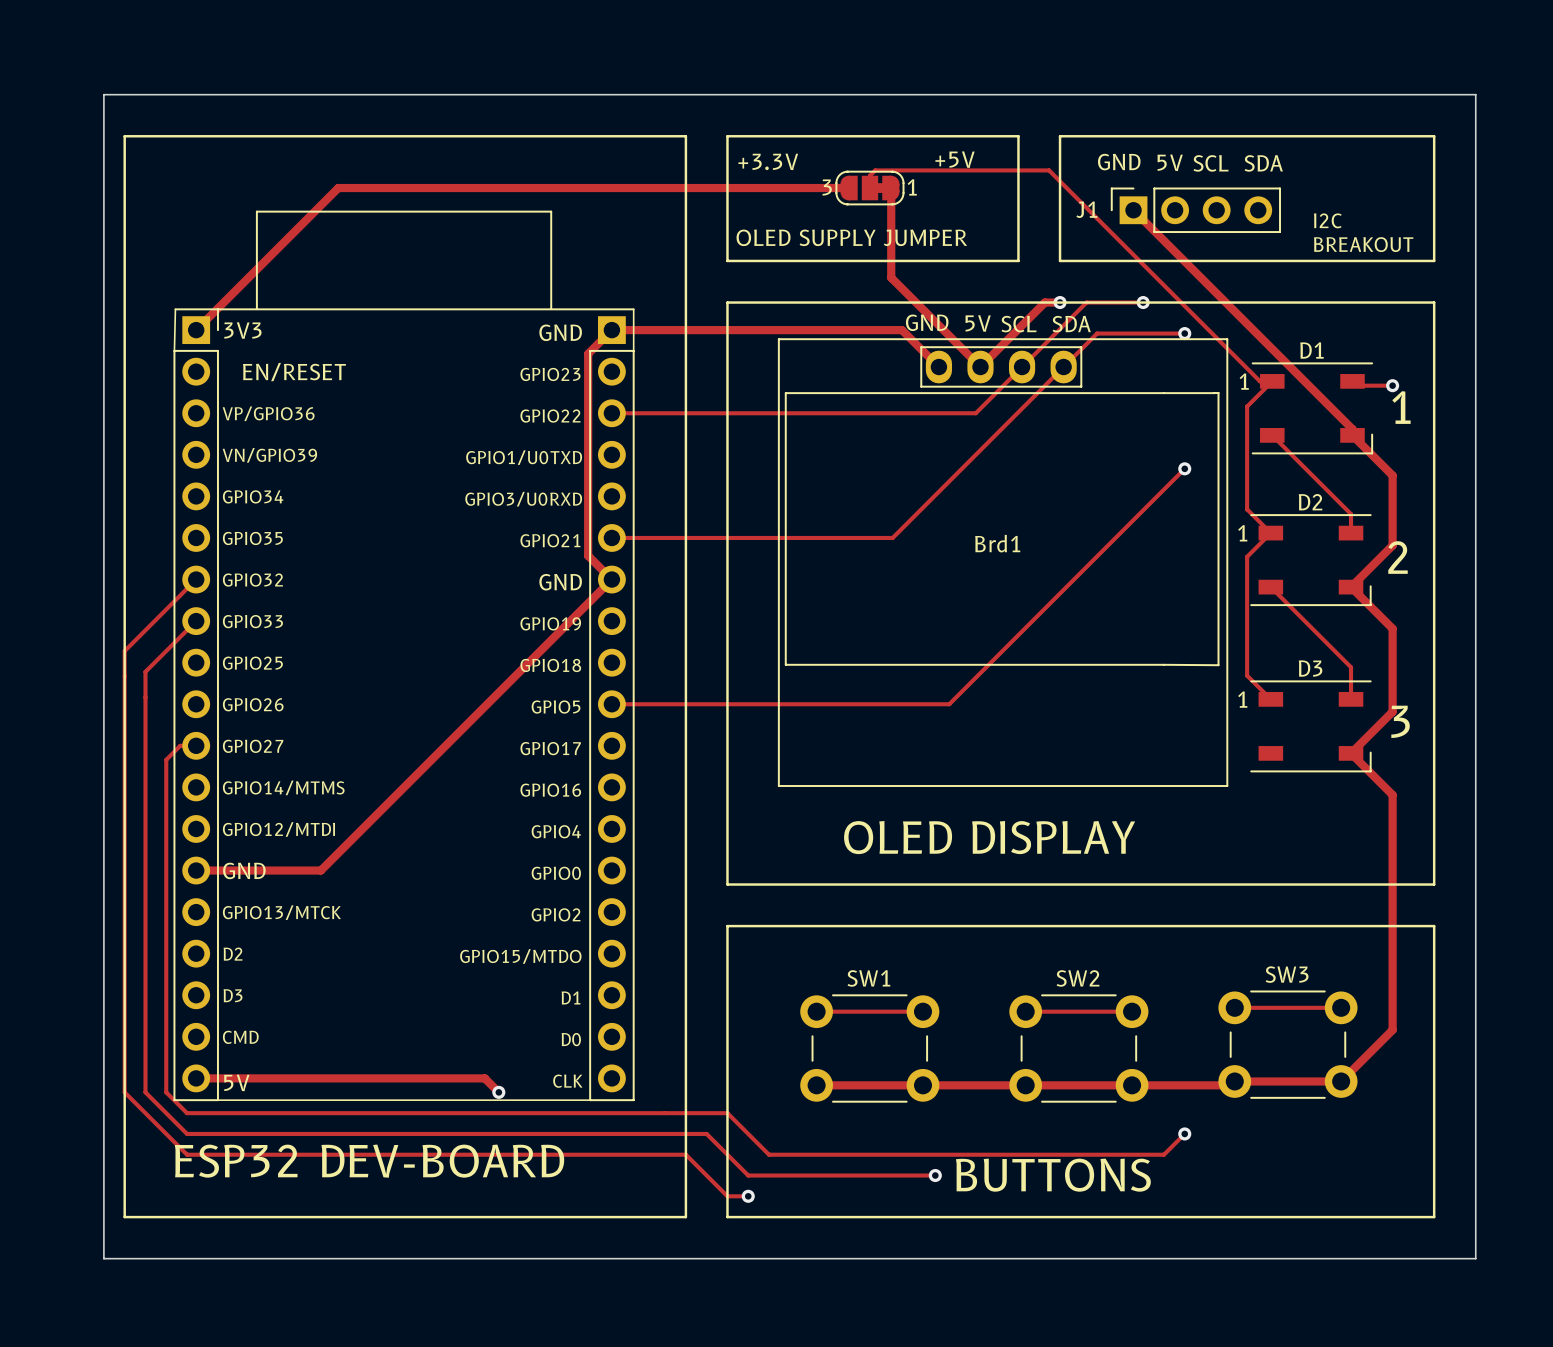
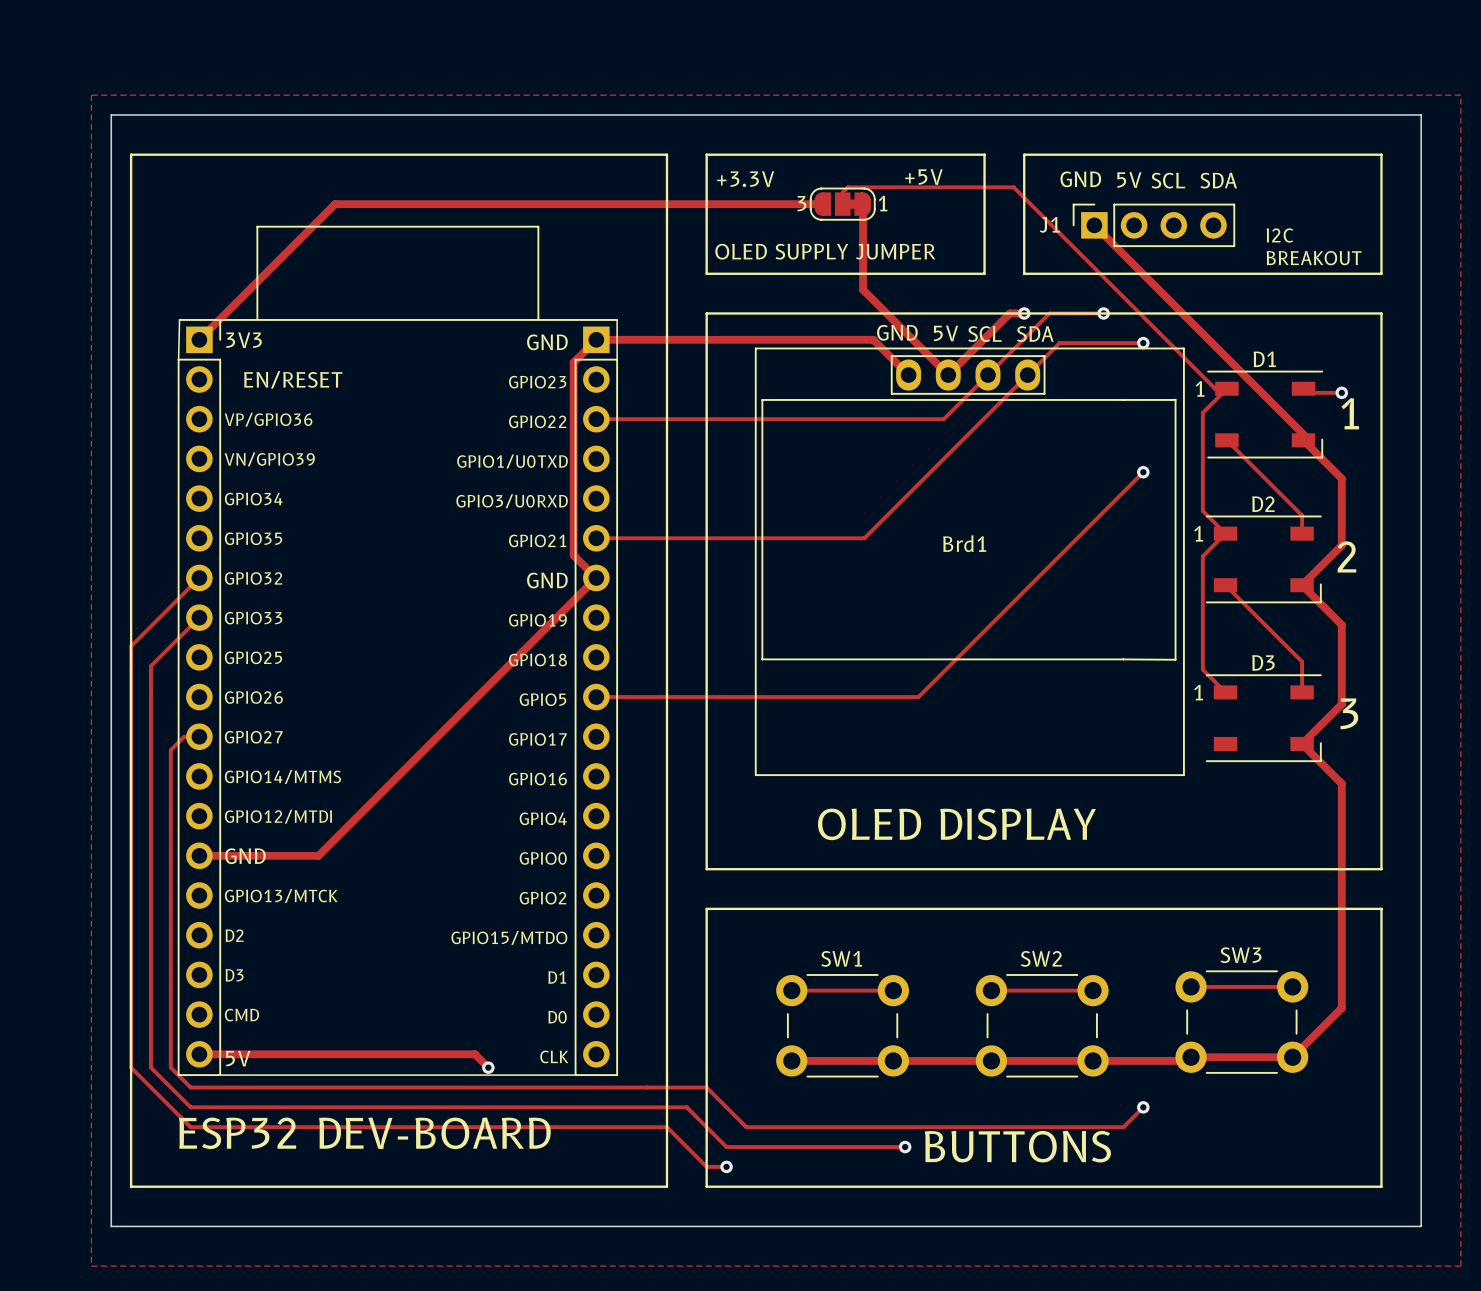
zone outline: none -> (91, 95) (91, 1266) (1460, 1266) (1460, 95) (91, 95)

